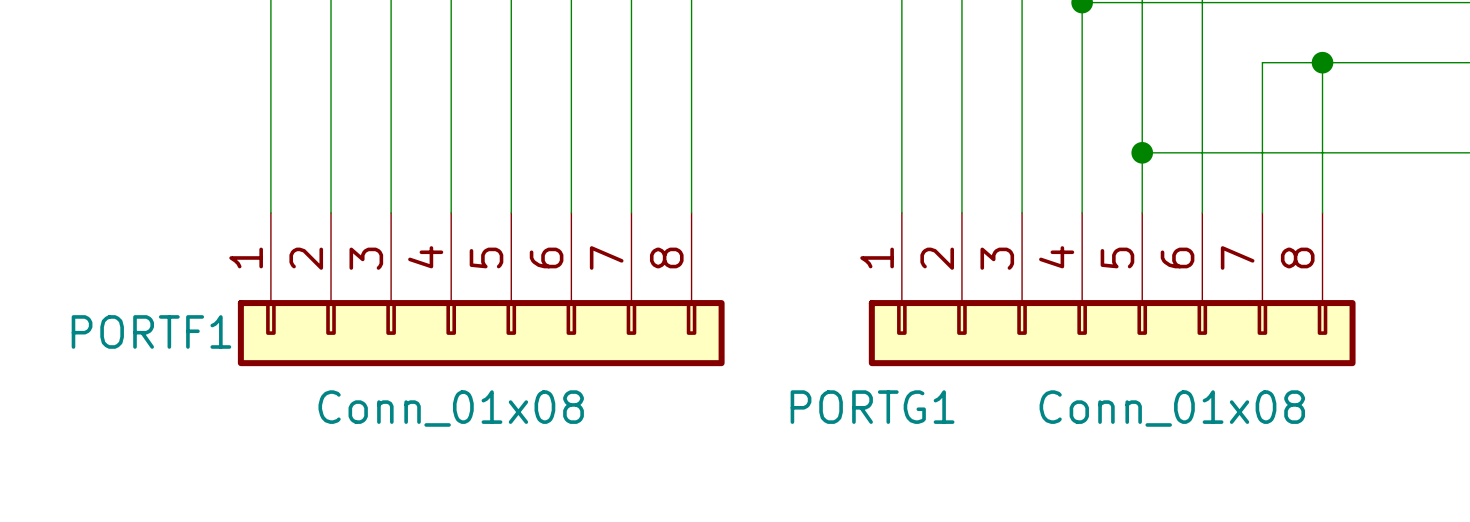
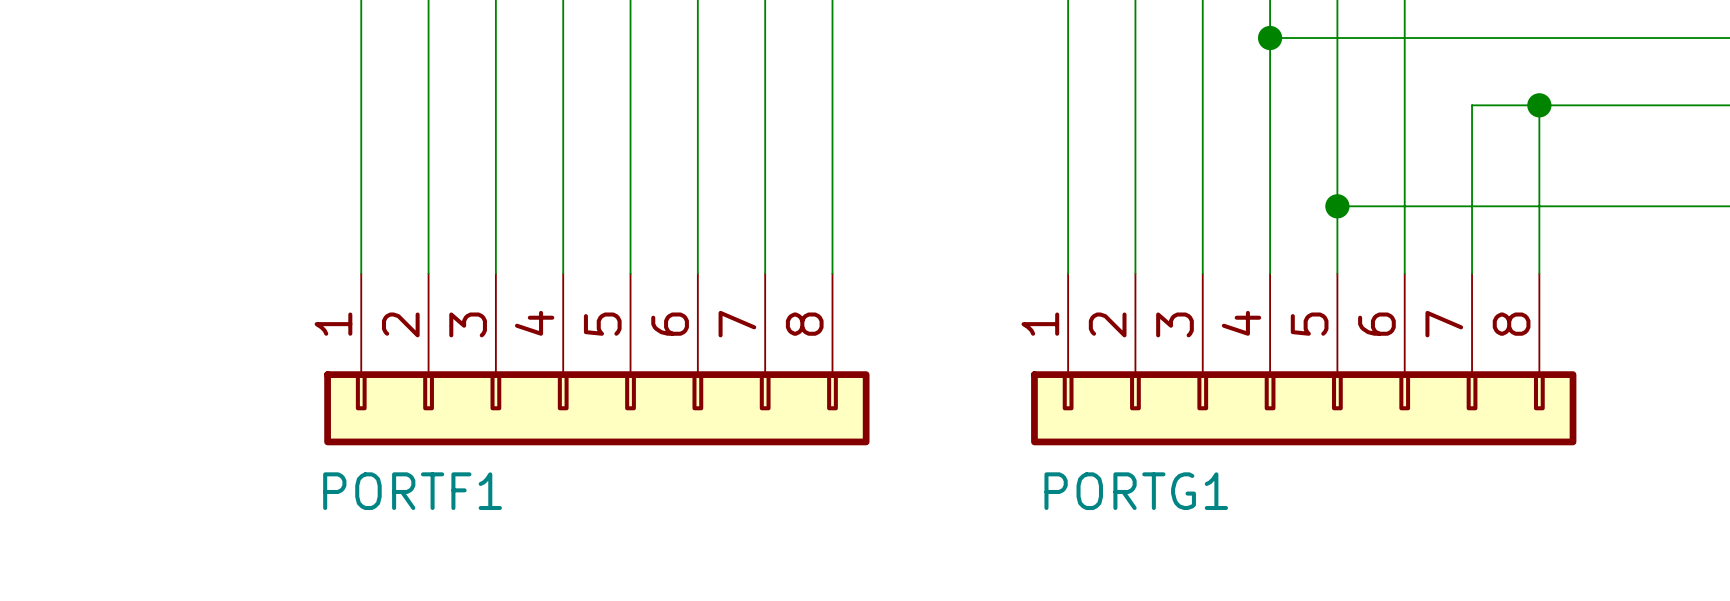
PORTF1 name position: PORTF1 (151, 331) -> PORTF1 (412, 491)
PORTG1 name position: PORTG1 (872, 407) -> PORTG1 (1136, 491)
PORTF1 value: Conn_01x08 (451, 408) -> none
PORTG1 value: Conn_01x08 (1172, 408) -> none

